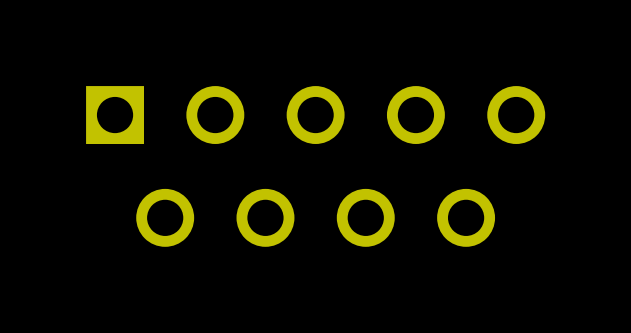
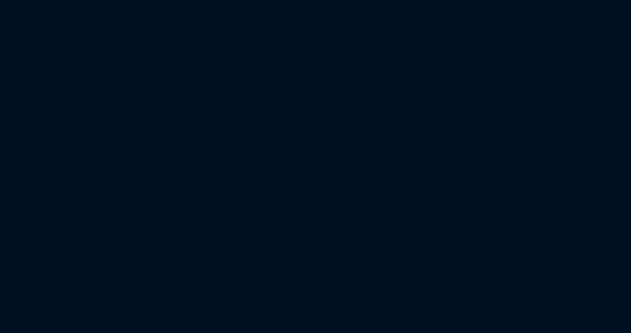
part: (315, 166) -> none

